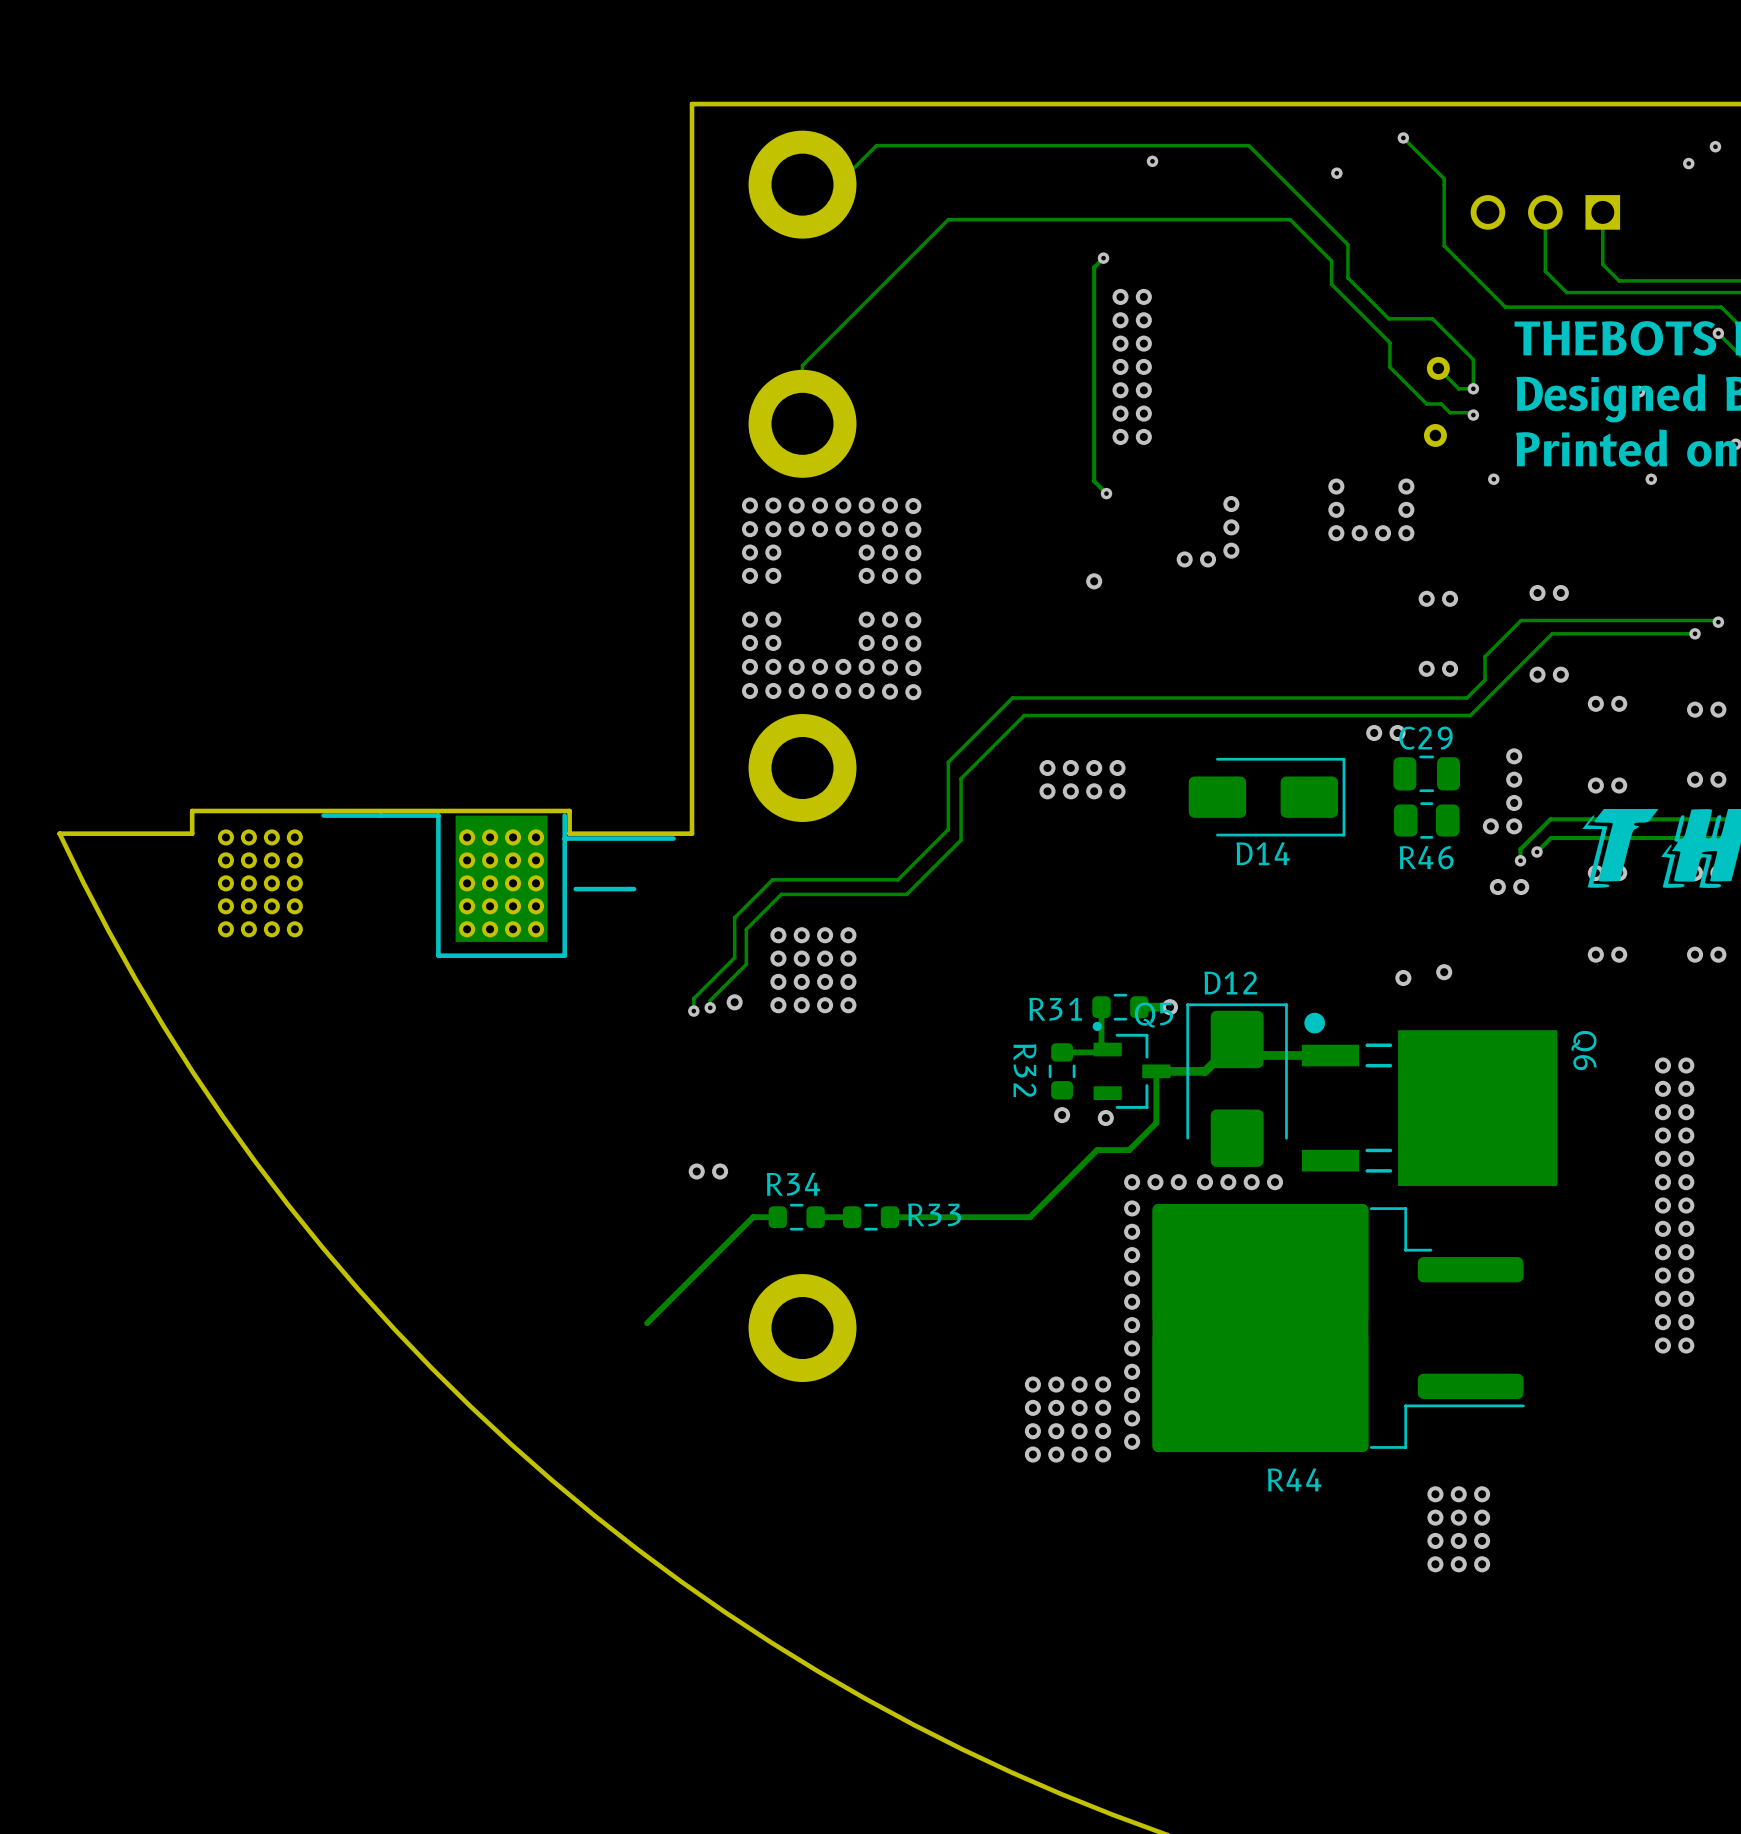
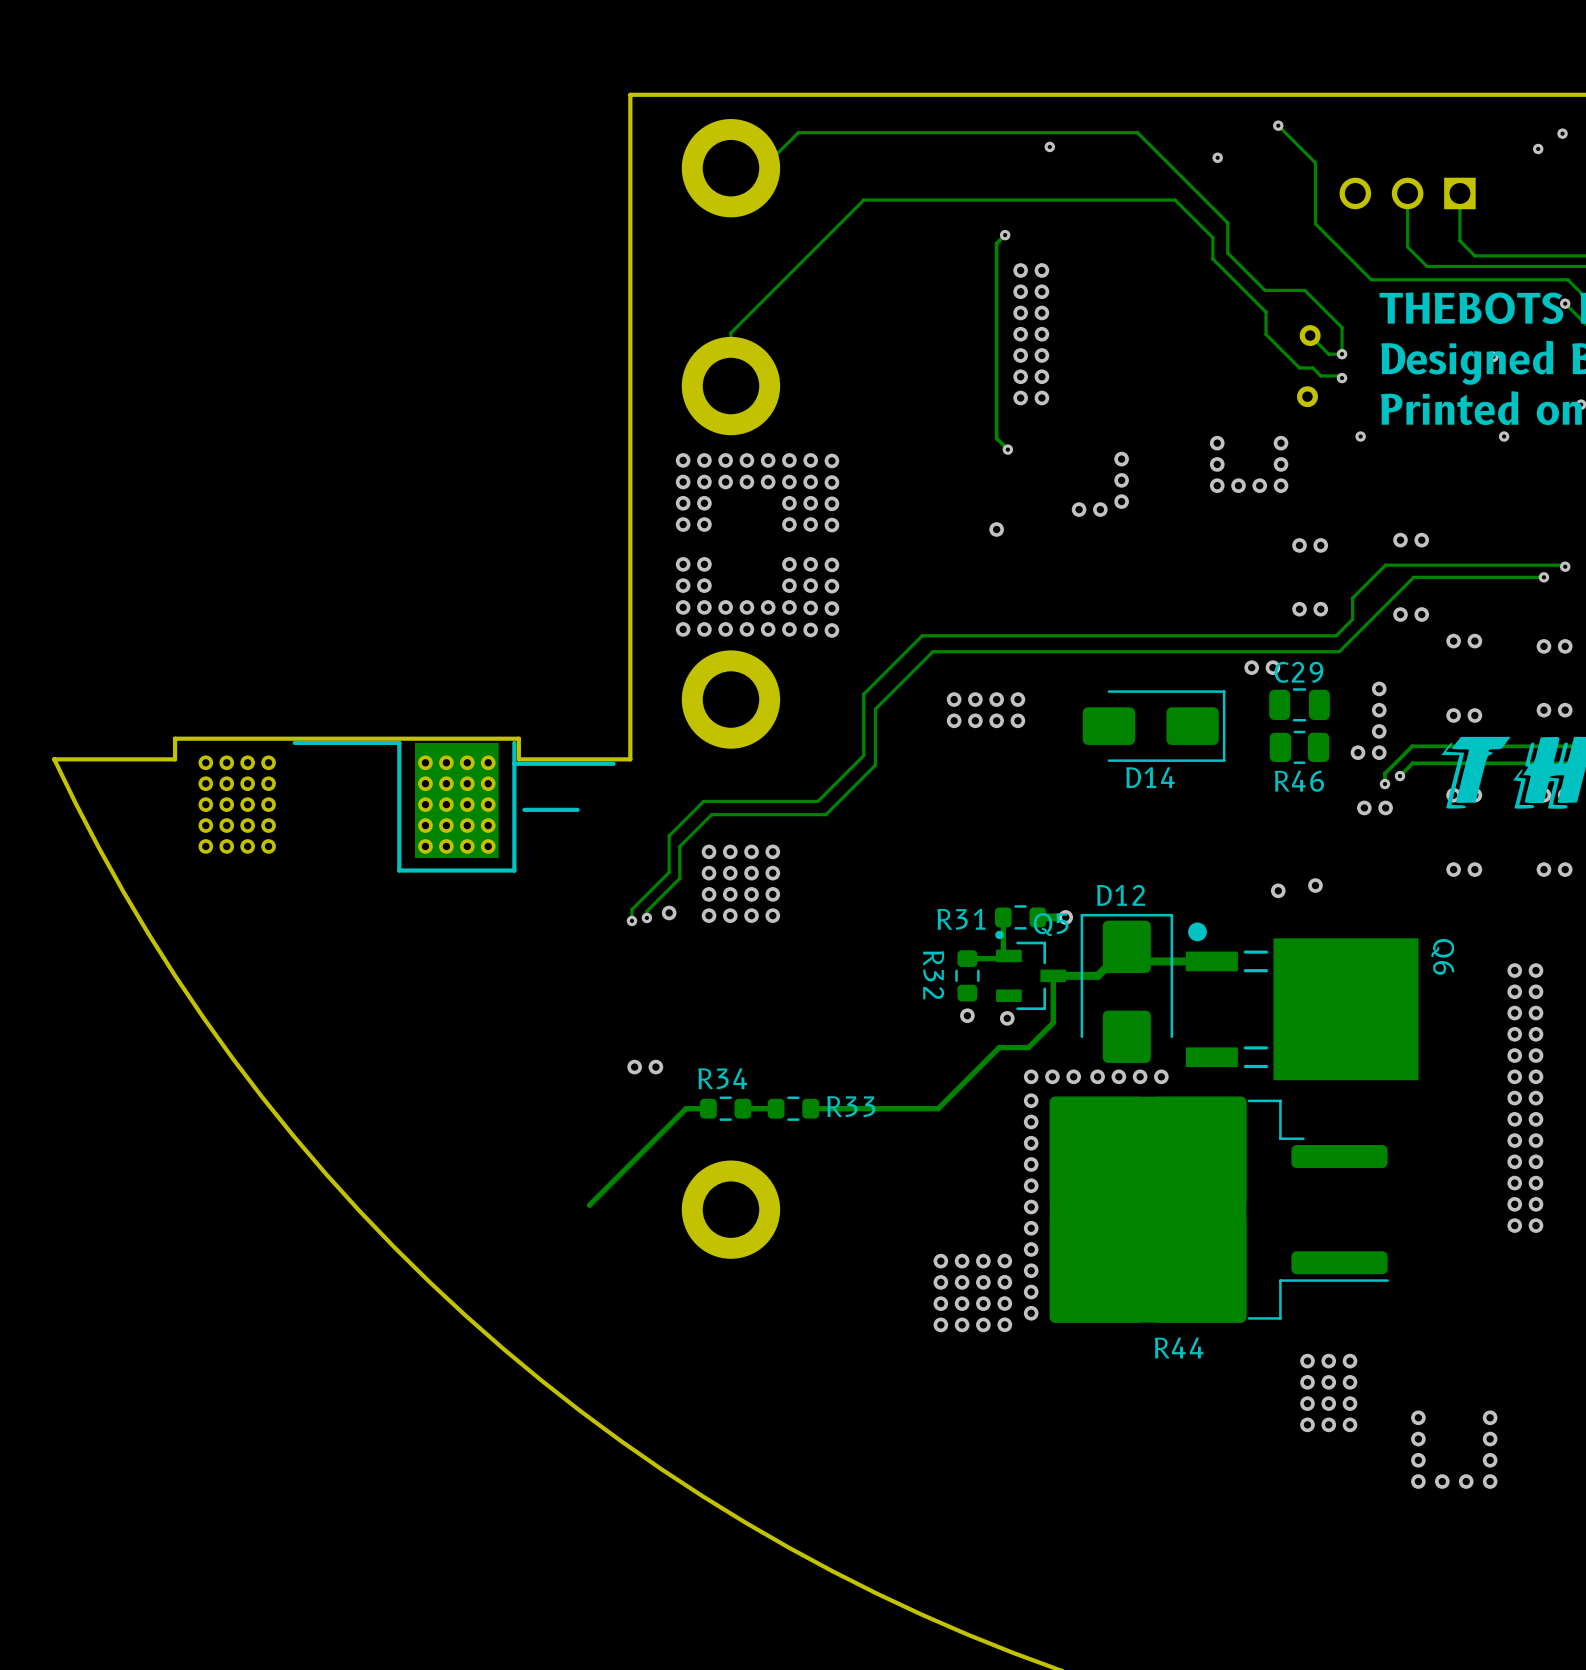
via: none -> (1418, 1417)
via: none -> (1490, 1417)
via: none -> (1418, 1439)
via: none -> (1490, 1439)
via: none -> (1418, 1460)
via: none -> (1490, 1460)
via: none -> (1418, 1481)
via: none -> (1442, 1481)
via: none -> (1466, 1481)
via: none -> (1490, 1481)

